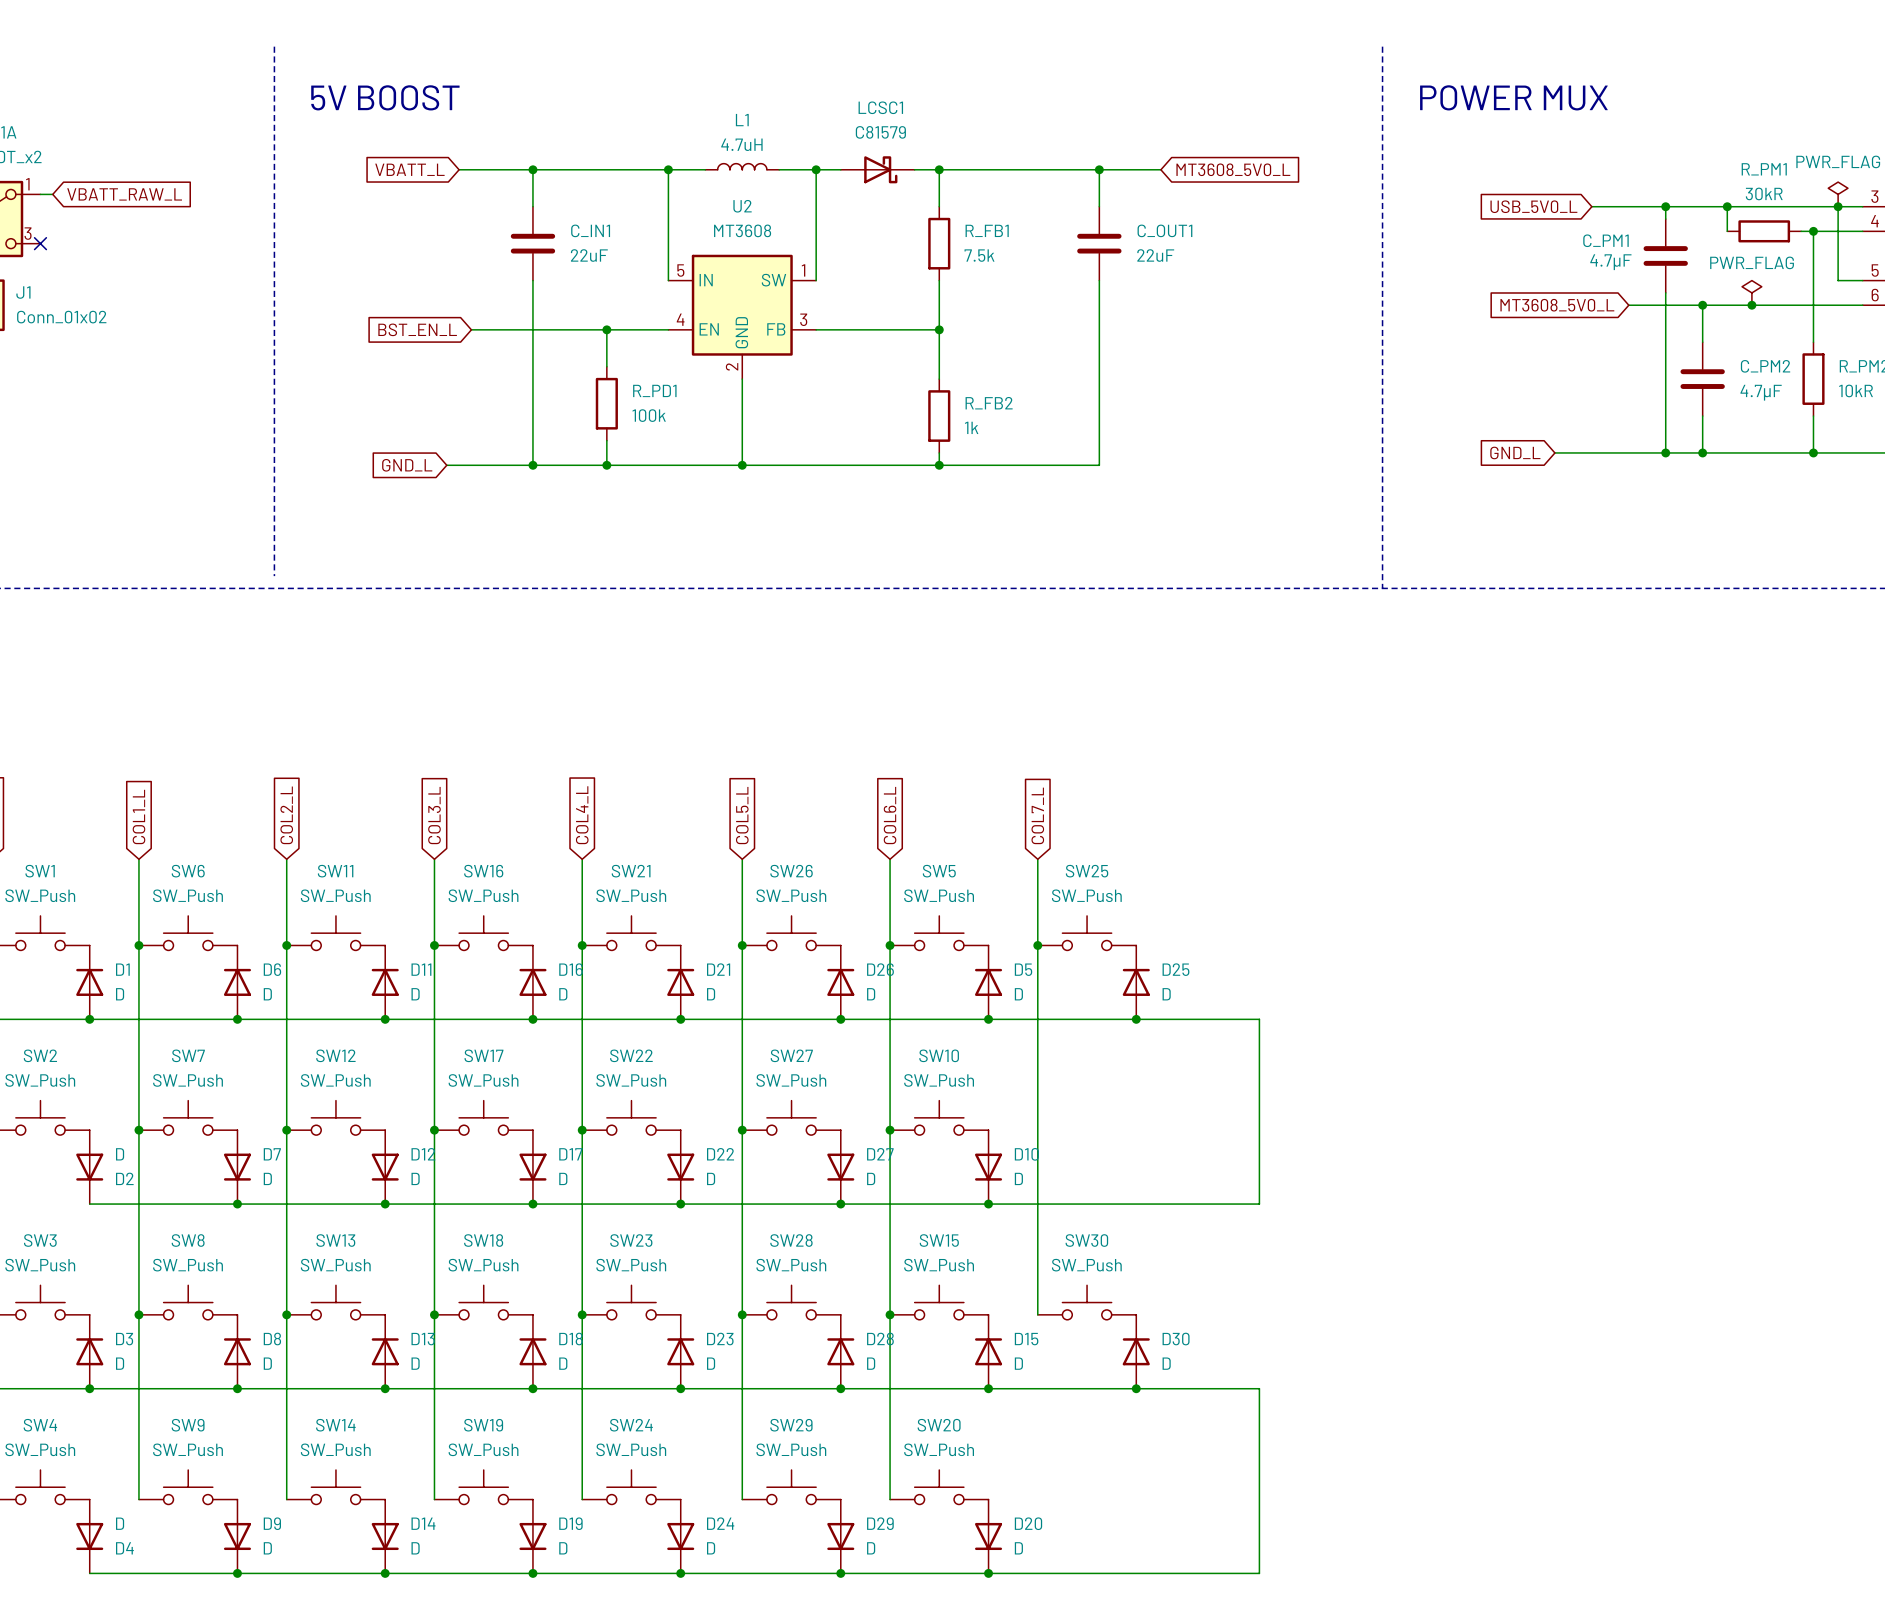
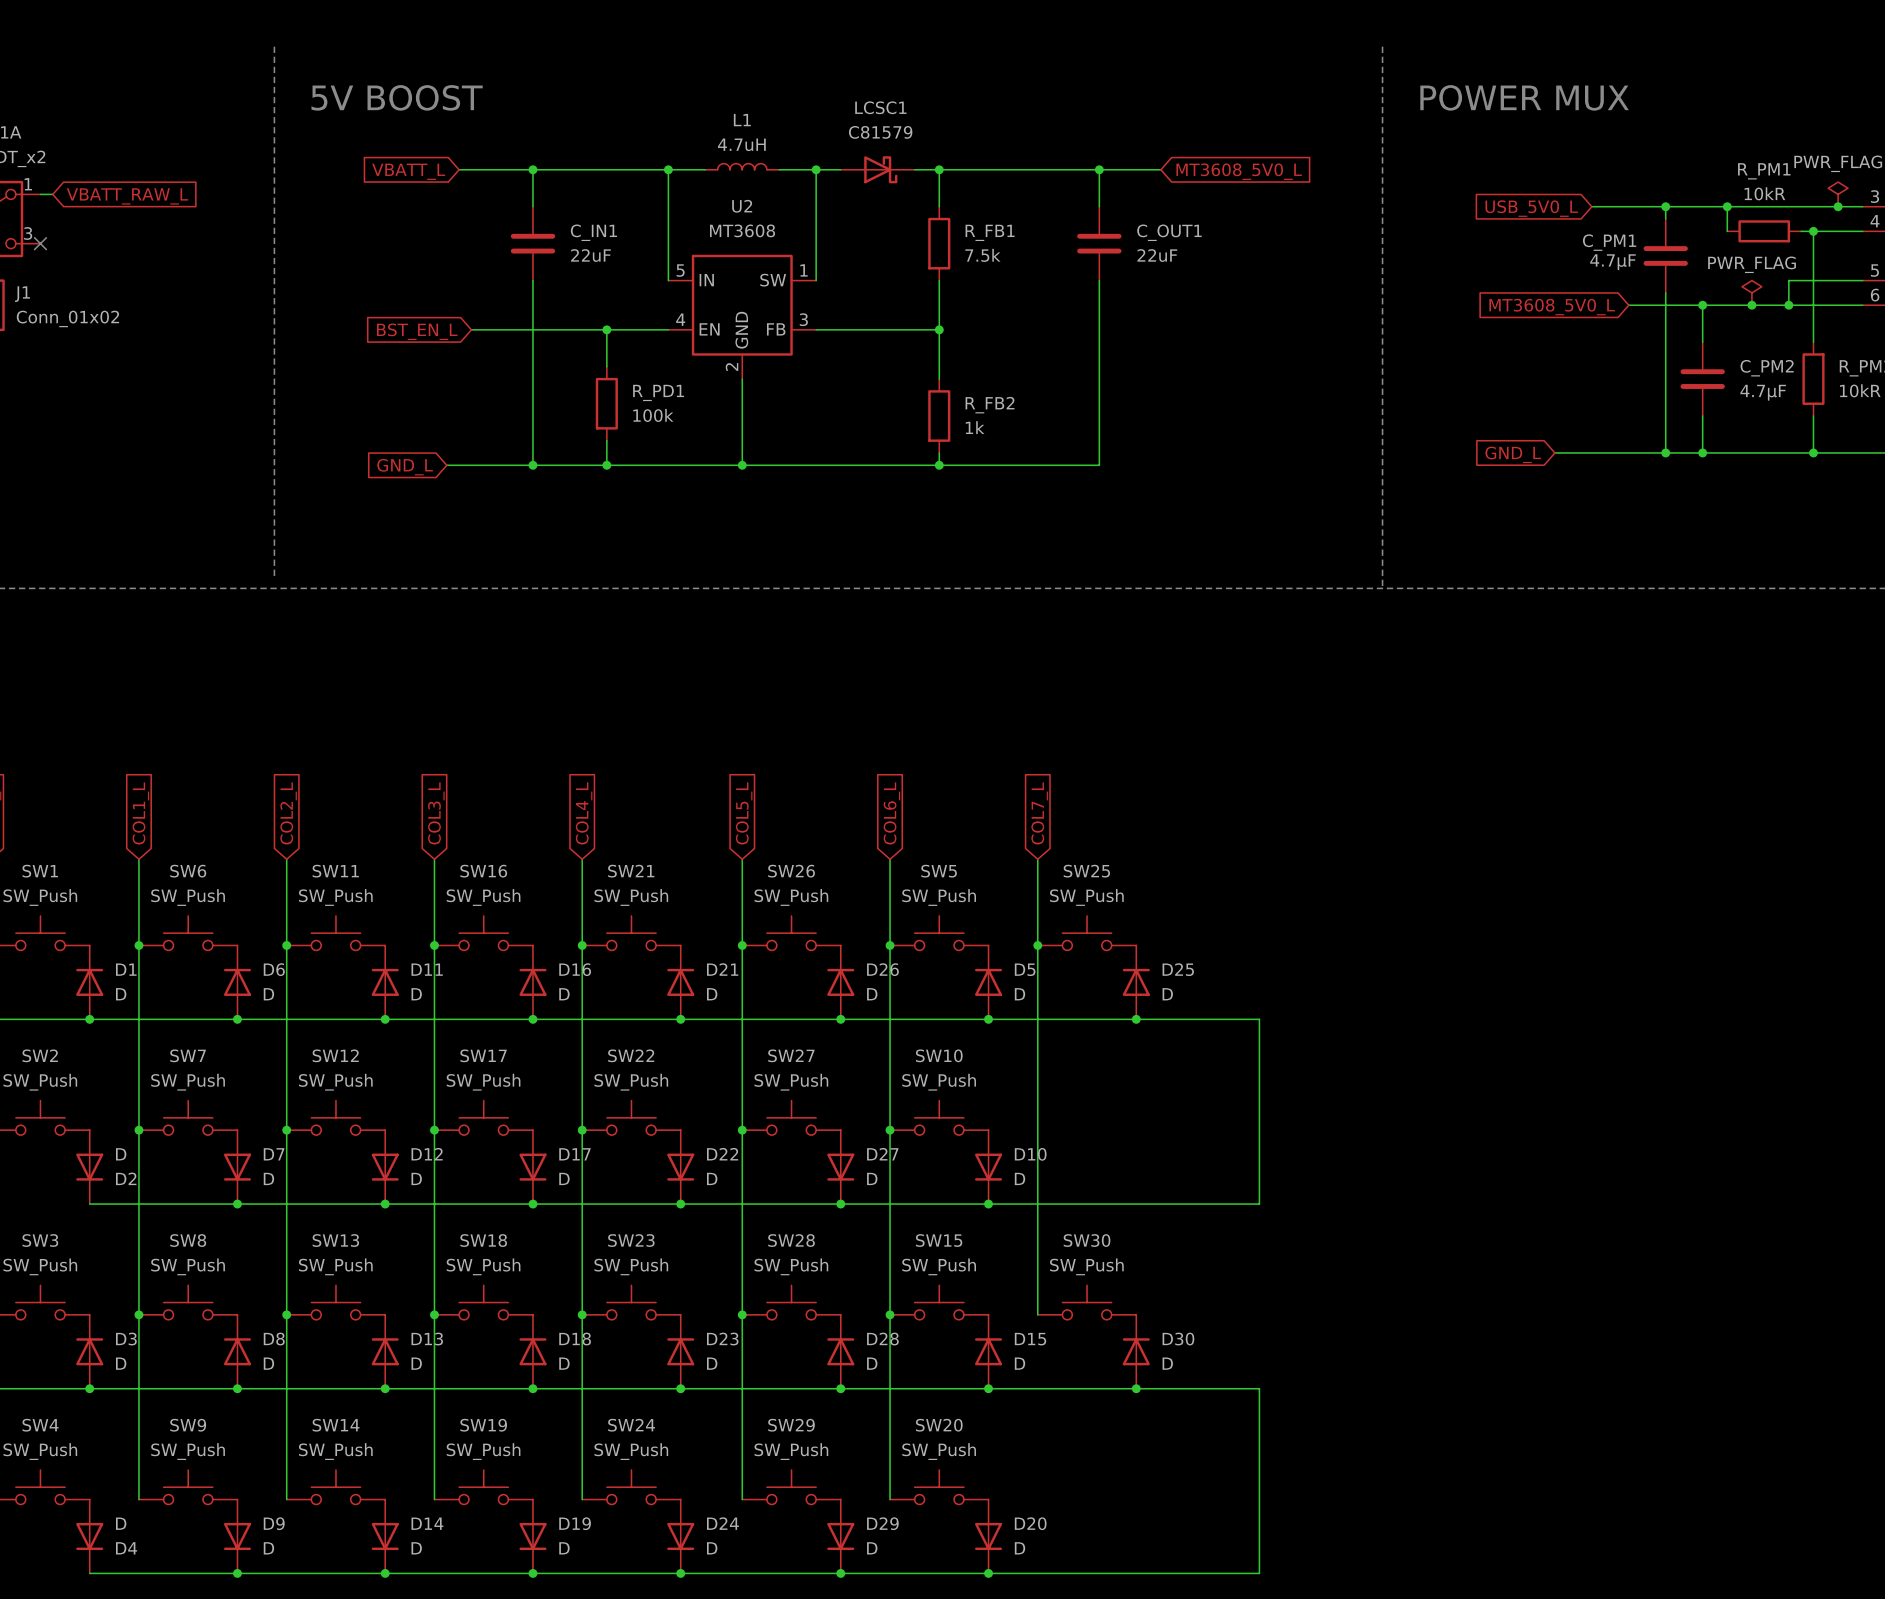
R_PM1 value: 30kR (1764, 193) -> 10kR (1764, 193)
wire: (1838, 206) (1838, 280) -> (1788, 305) (1788, 280) (1838, 280)
junction: none -> (1788, 305)

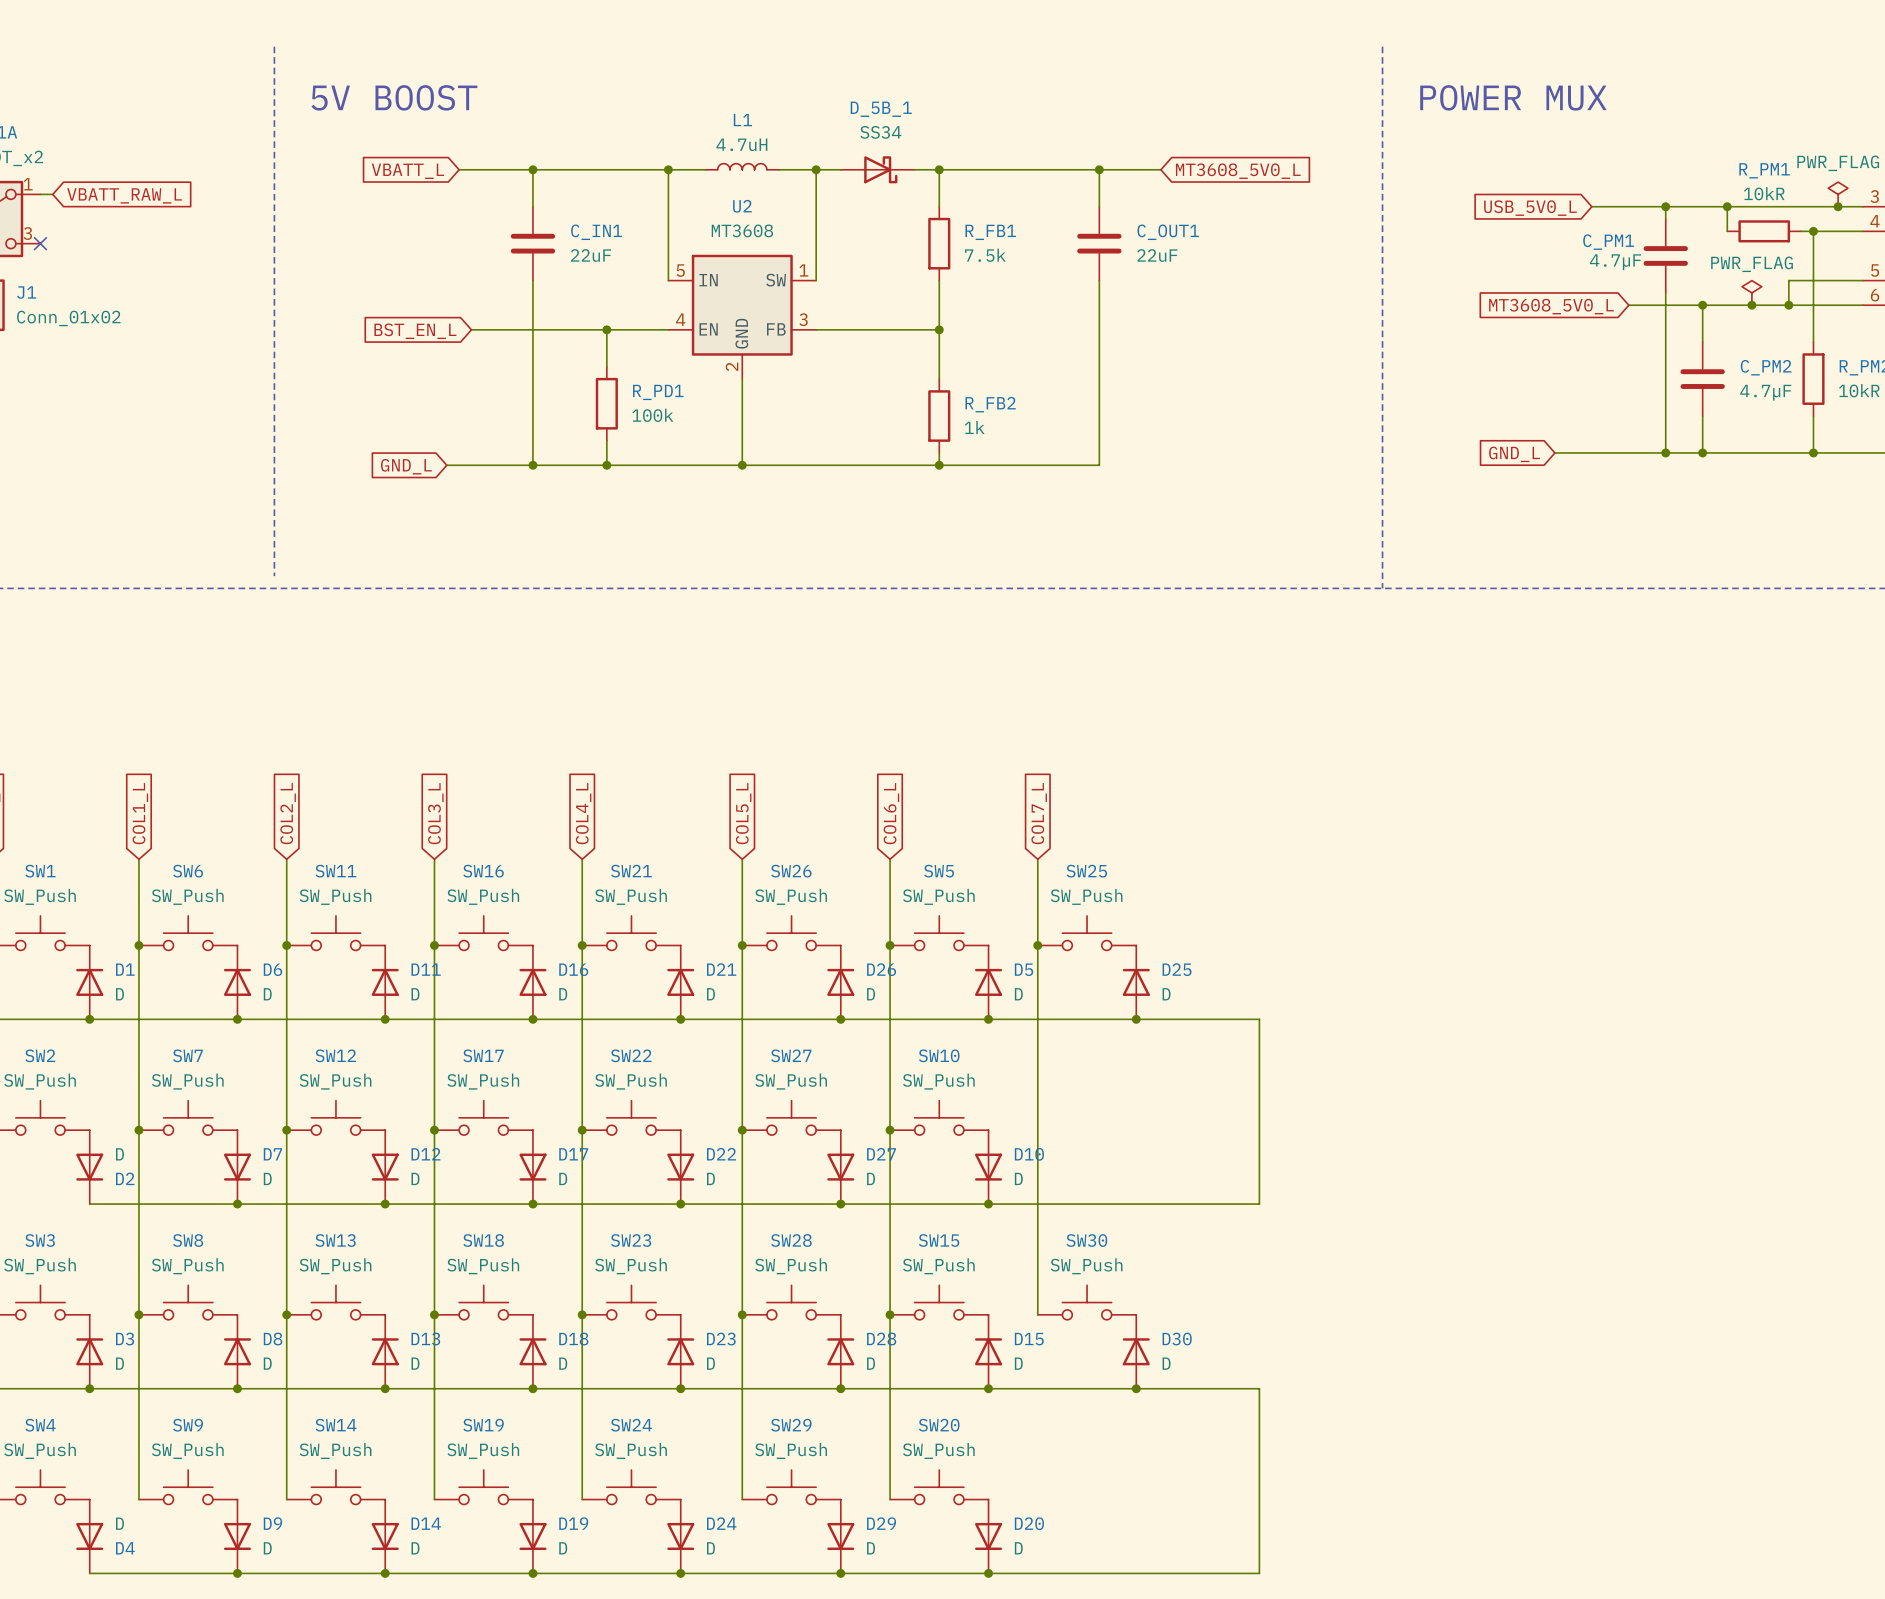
LCSC1 name: LCSC1 (880, 107) -> D_5B_1 (881, 109)
LCSC1 value: C81579 (880, 132) -> SS34 (880, 132)

